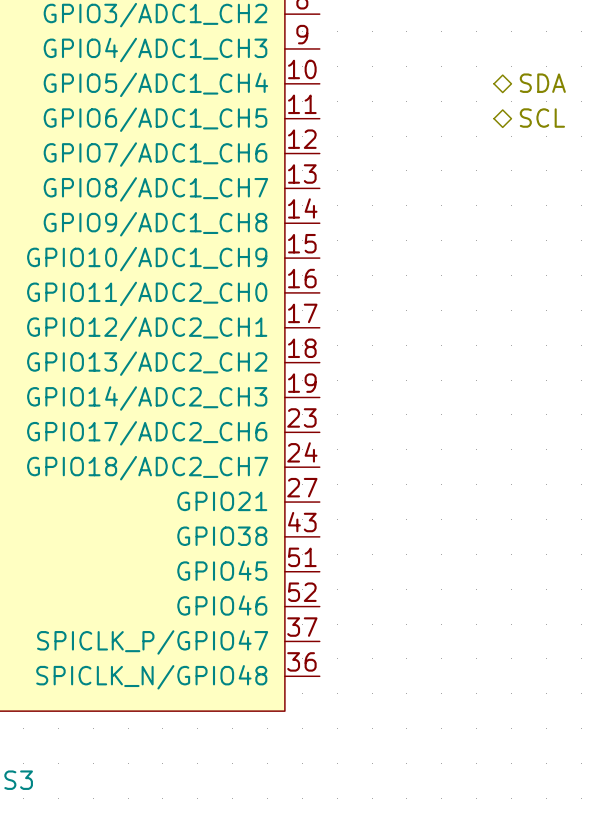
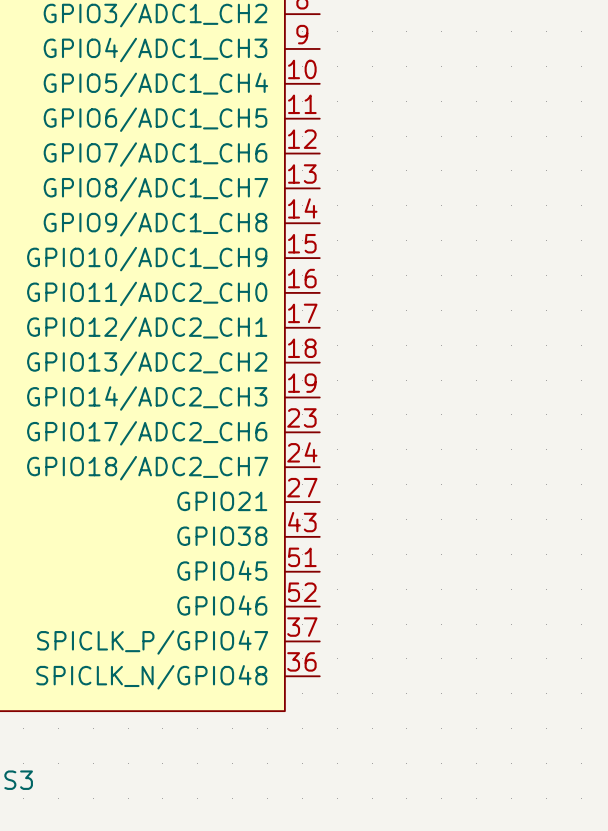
hierarchical label: SDA (542, 83) -> none
hierarchical label: SCL (542, 118) -> none

